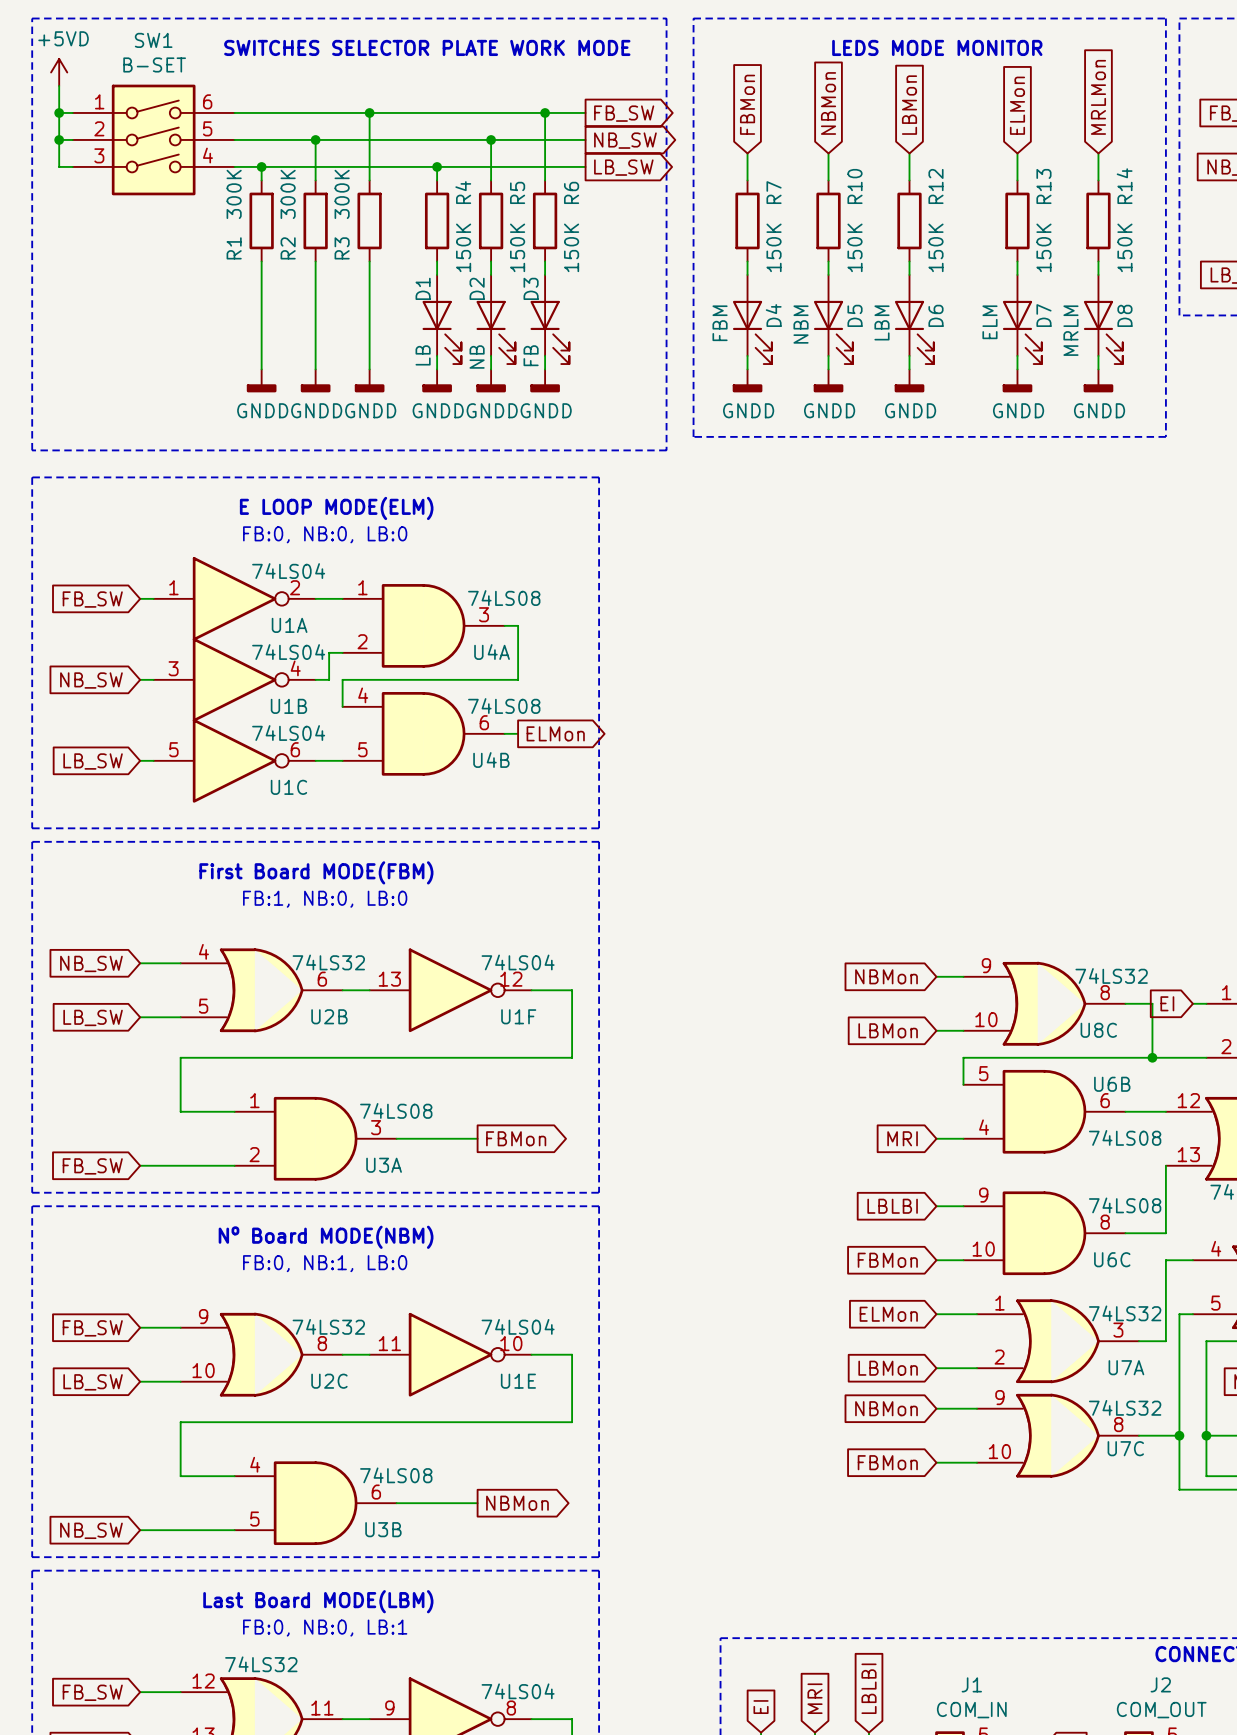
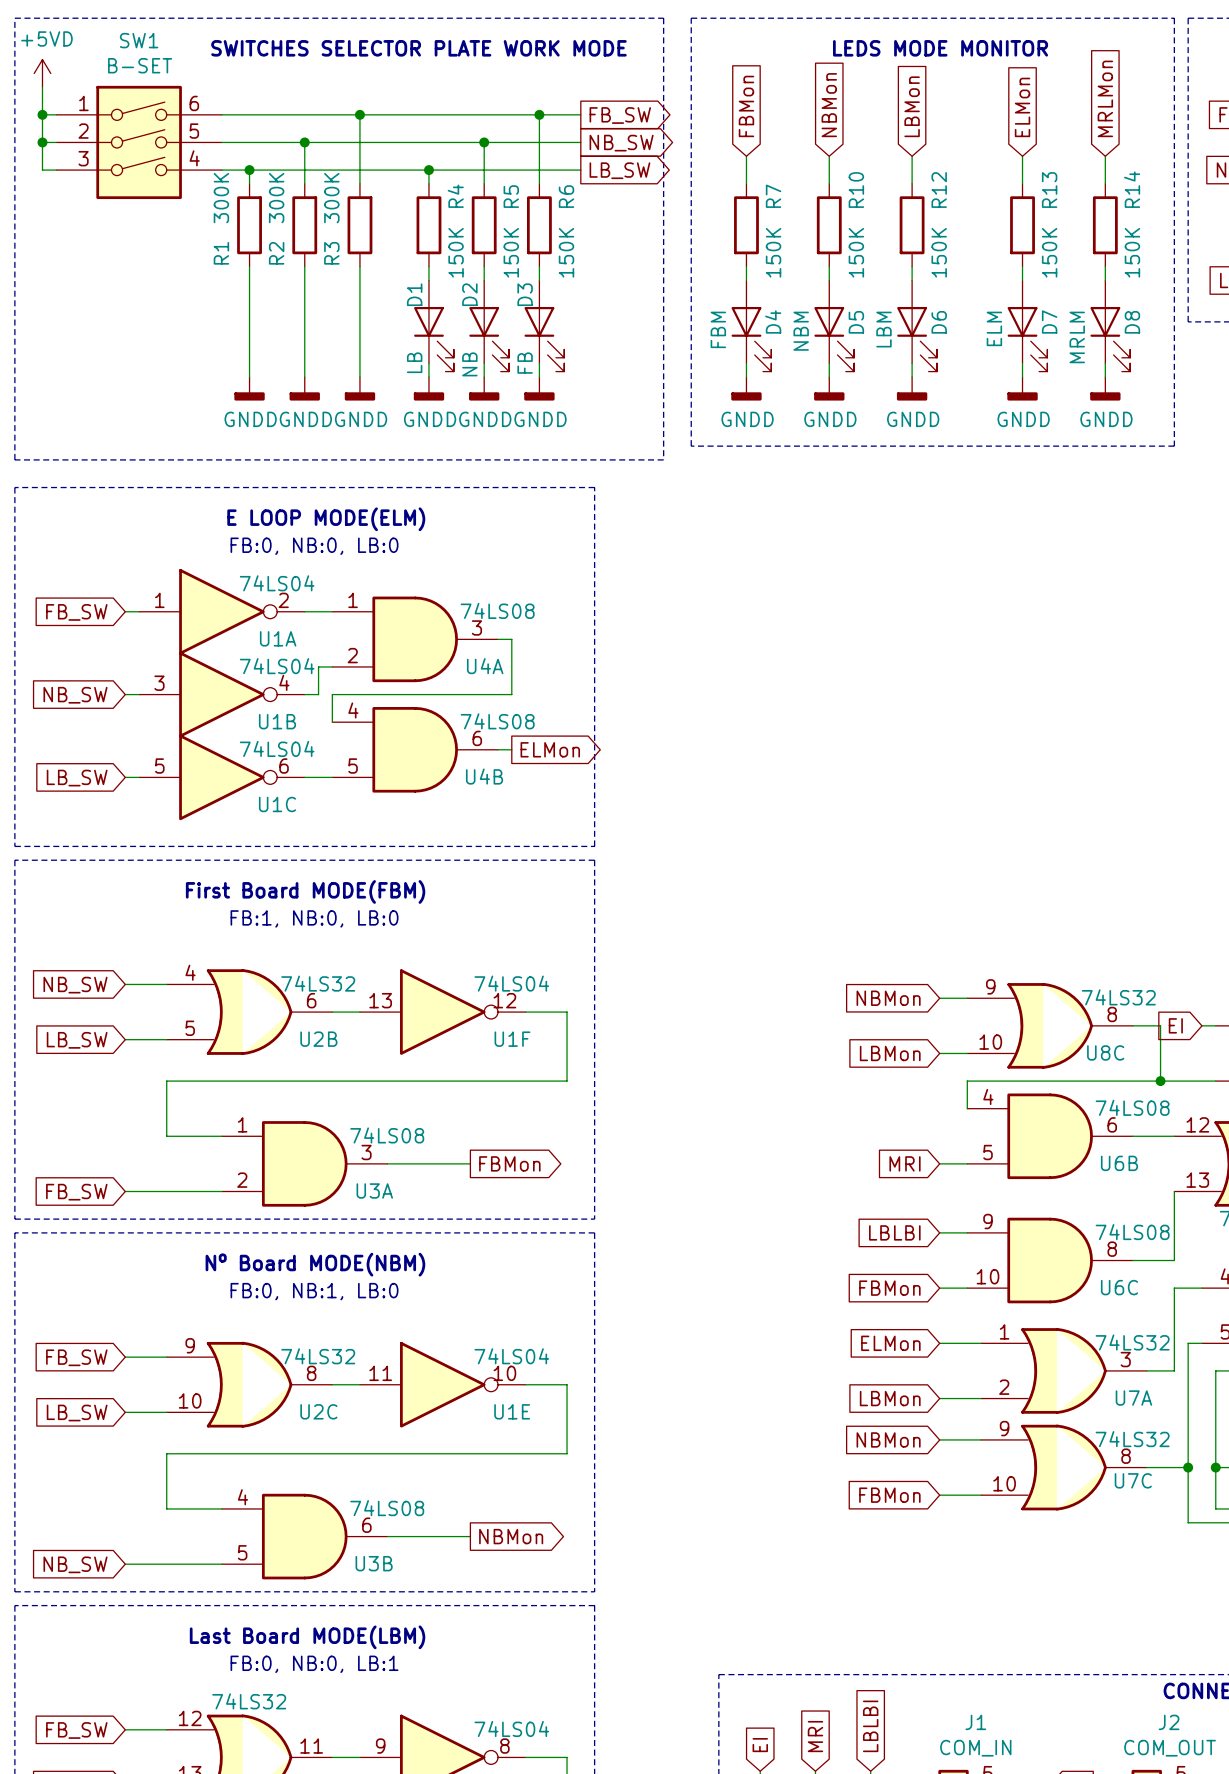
U6B flip: as is (1044, 1111) -> up-down (1050, 1136)

